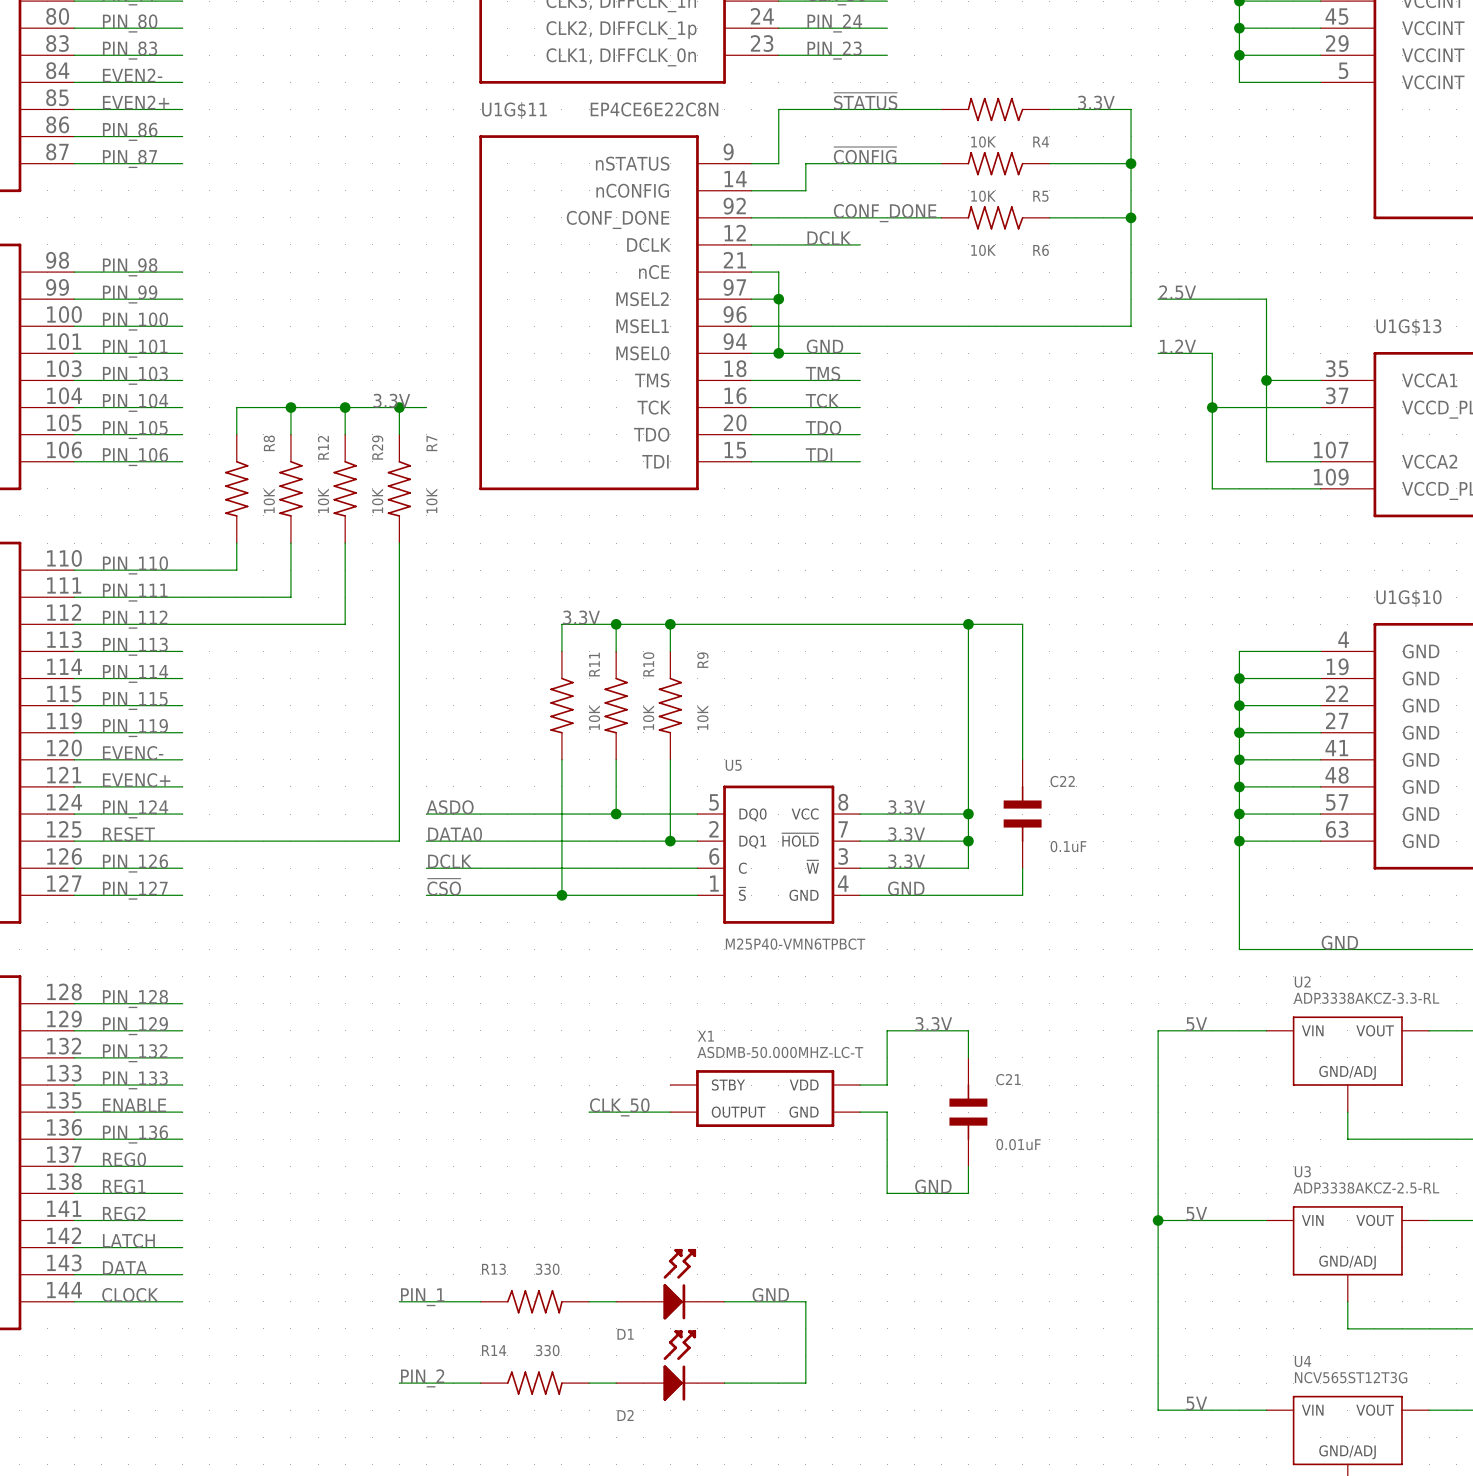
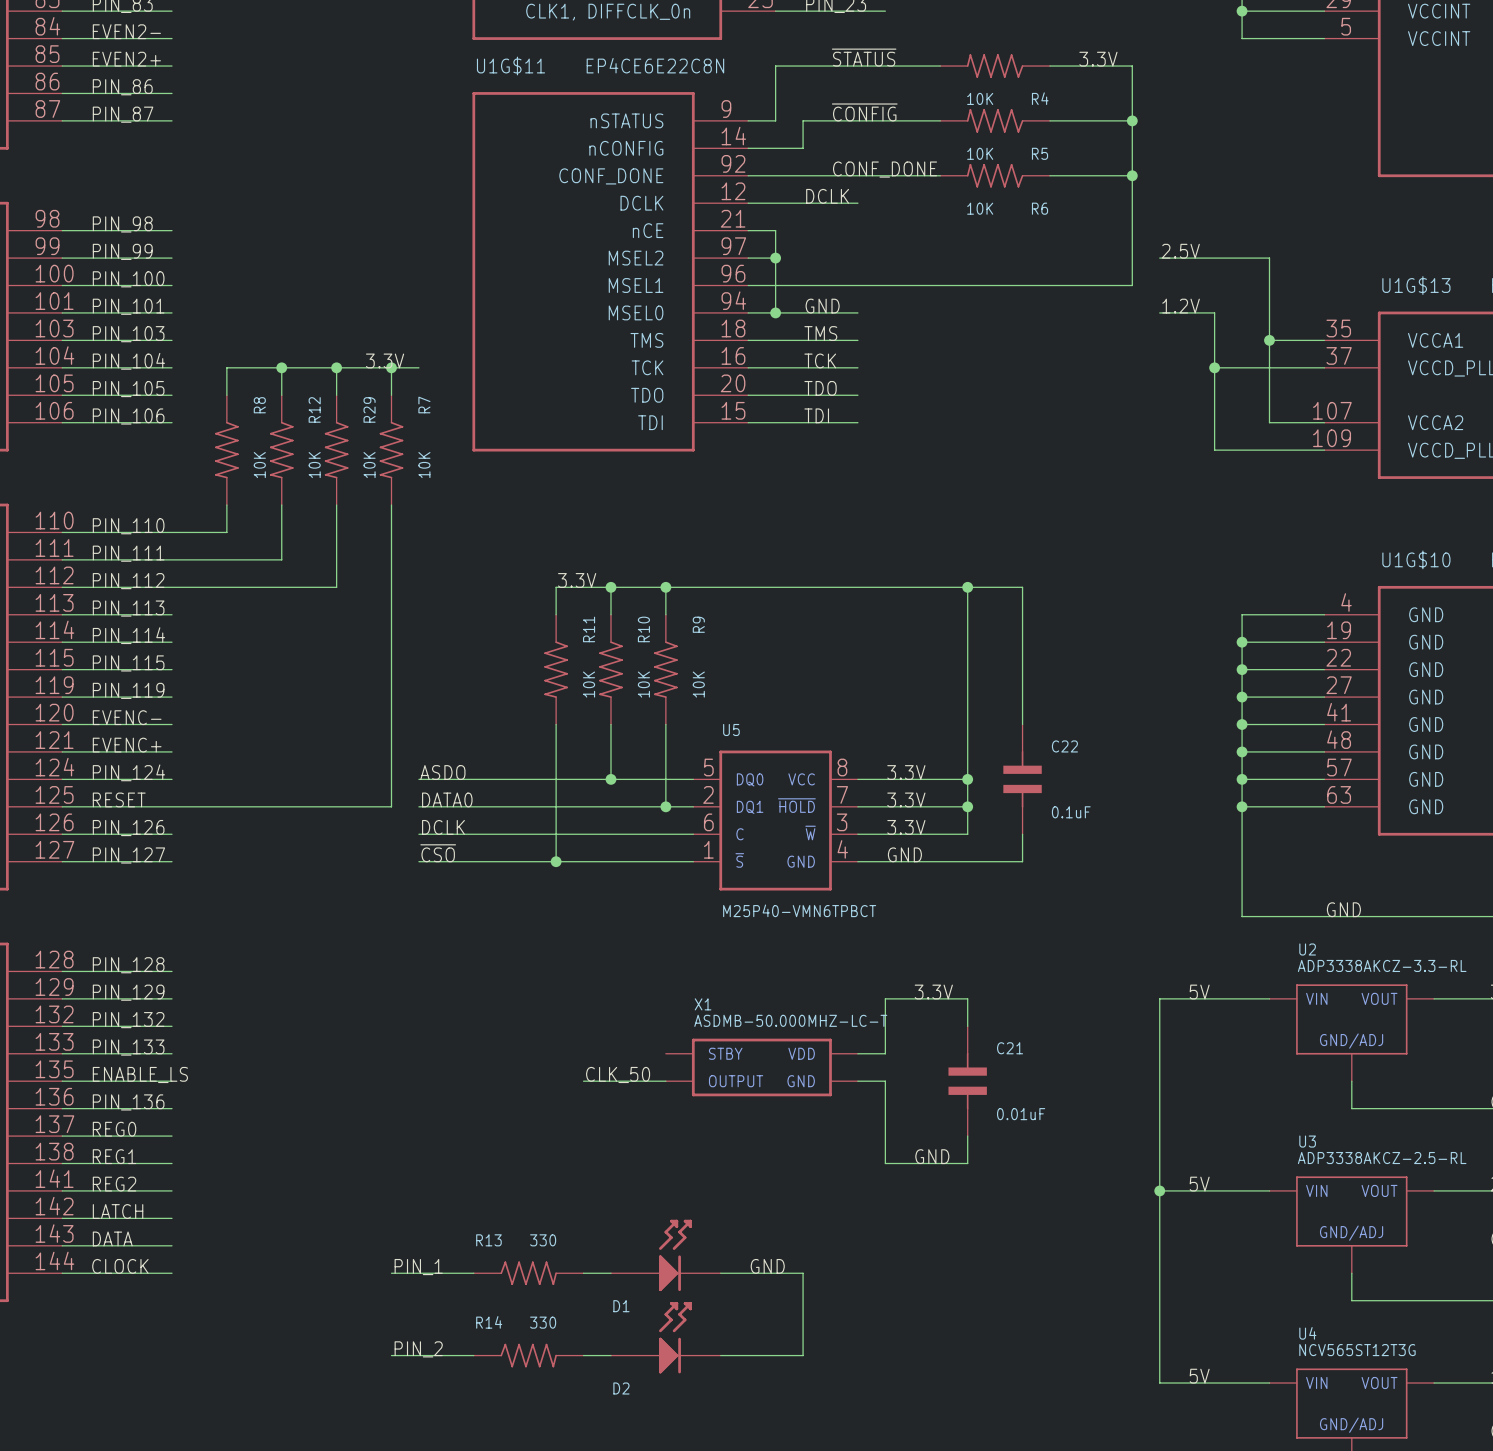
label: ENABLE (134, 1105) -> ENABLE_LS (140, 1074)

